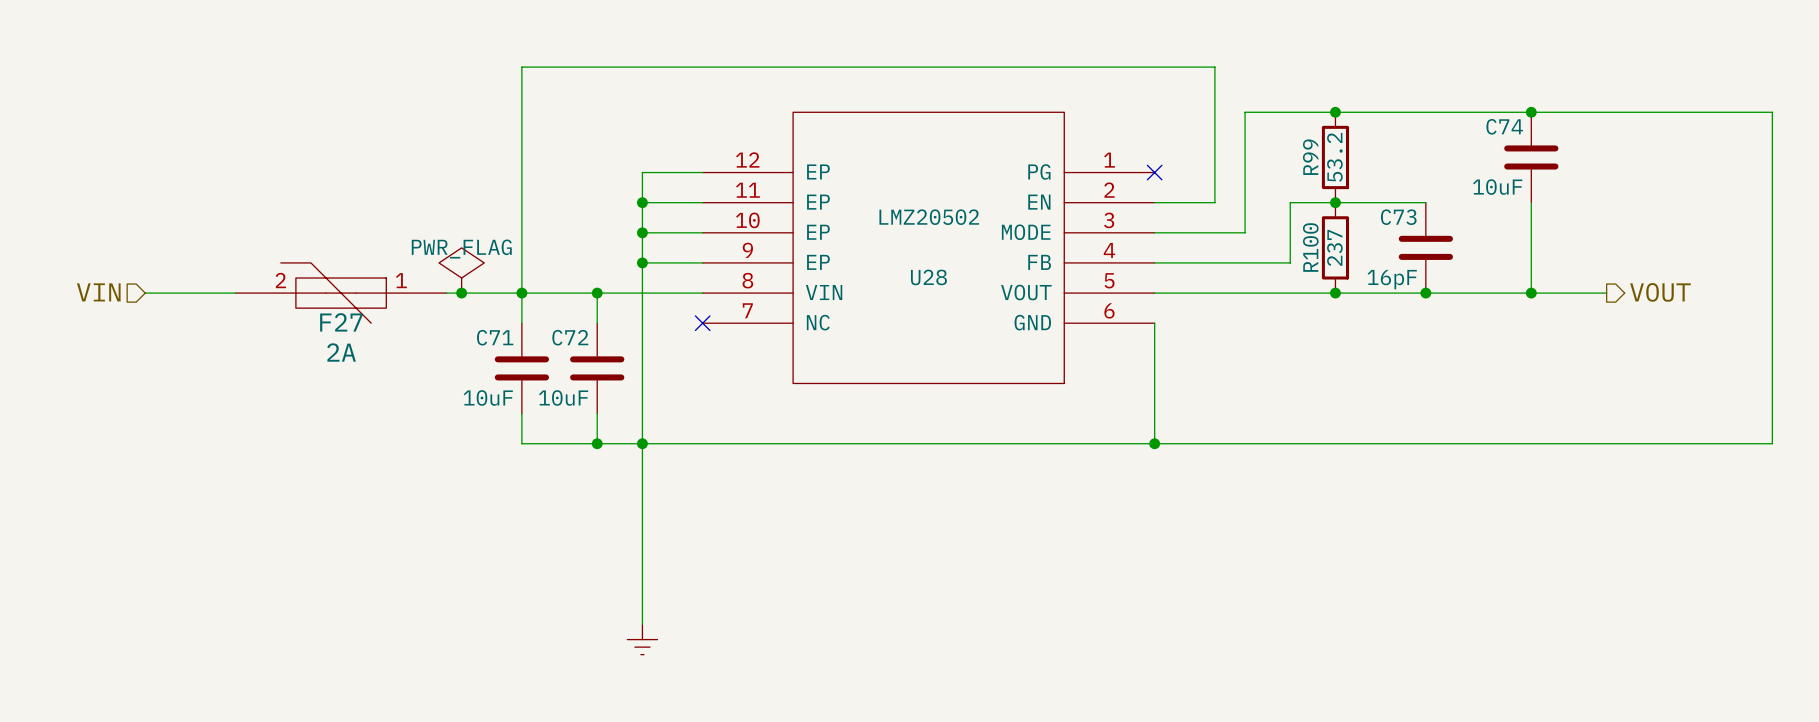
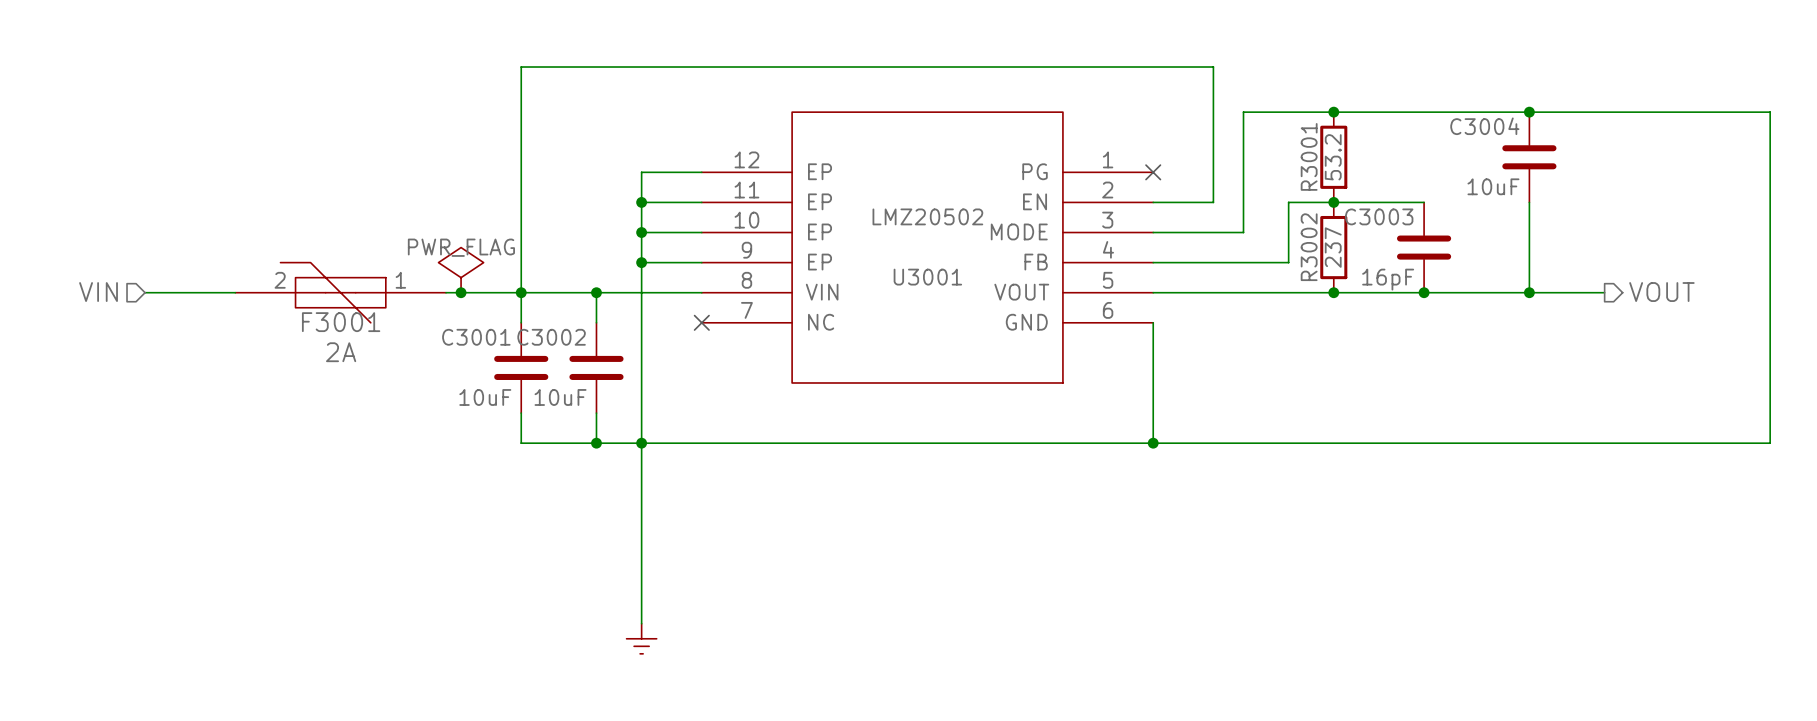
C74 name: C74 (1504, 126) -> C3004 (1484, 126)
R99 name: R99 (1310, 157) -> R3001 (1309, 156)
C73 name: C73 (1398, 217) -> C3003 (1379, 216)
R100 name: R100 (1310, 247) -> R3002 (1309, 247)
U28 name: U28 (928, 277) -> U3001 (927, 277)
F27 name: F27 (341, 322) -> F3001 (341, 322)
C71 name: C71 (495, 337) -> C3001 (476, 337)
C72 name: C72 (570, 337) -> C3002 (551, 337)

